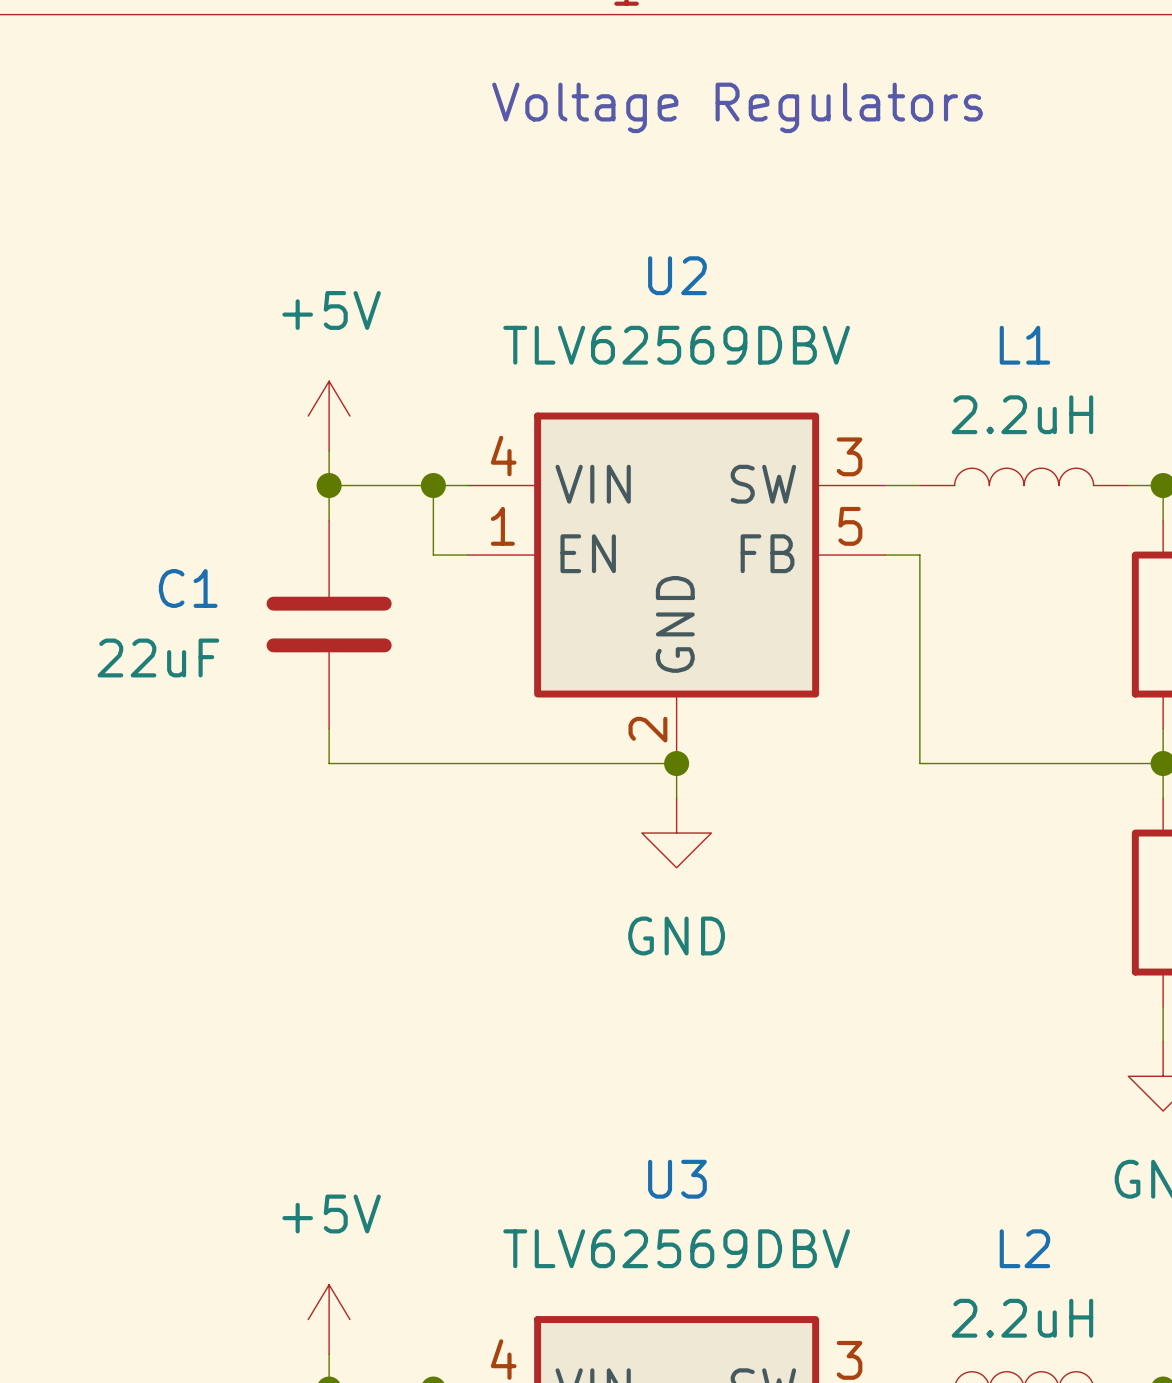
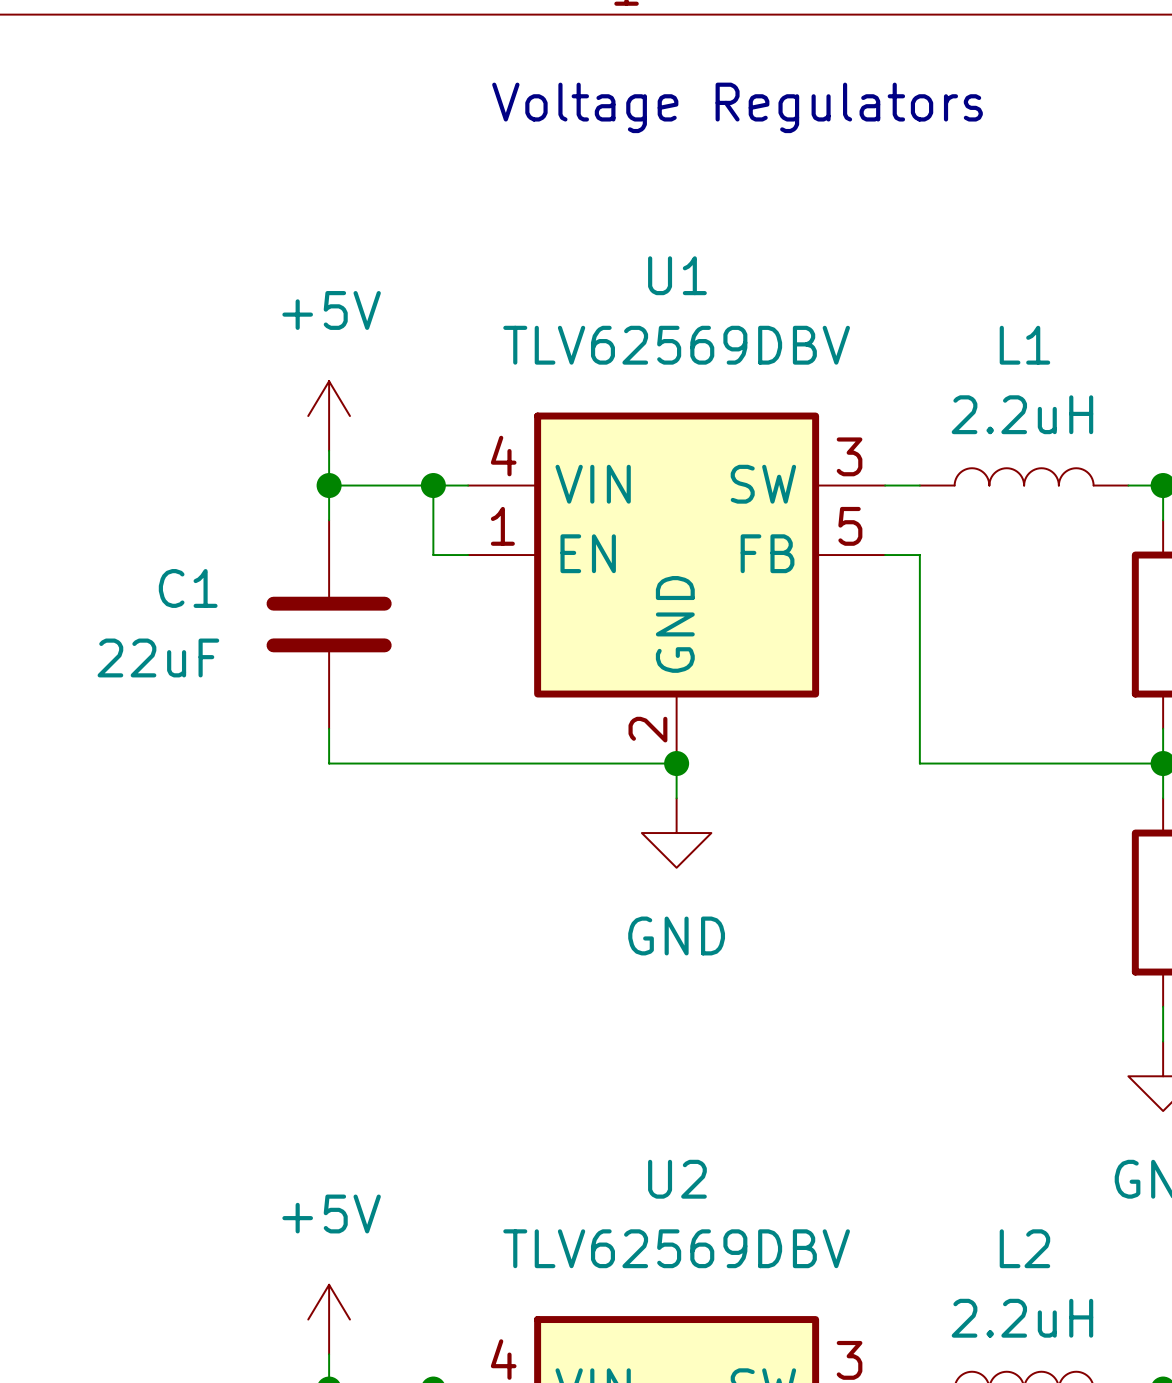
U2 name: U2 (677, 275) -> U1 (677, 275)
U3 name: U3 (677, 1179) -> U2 (677, 1179)

